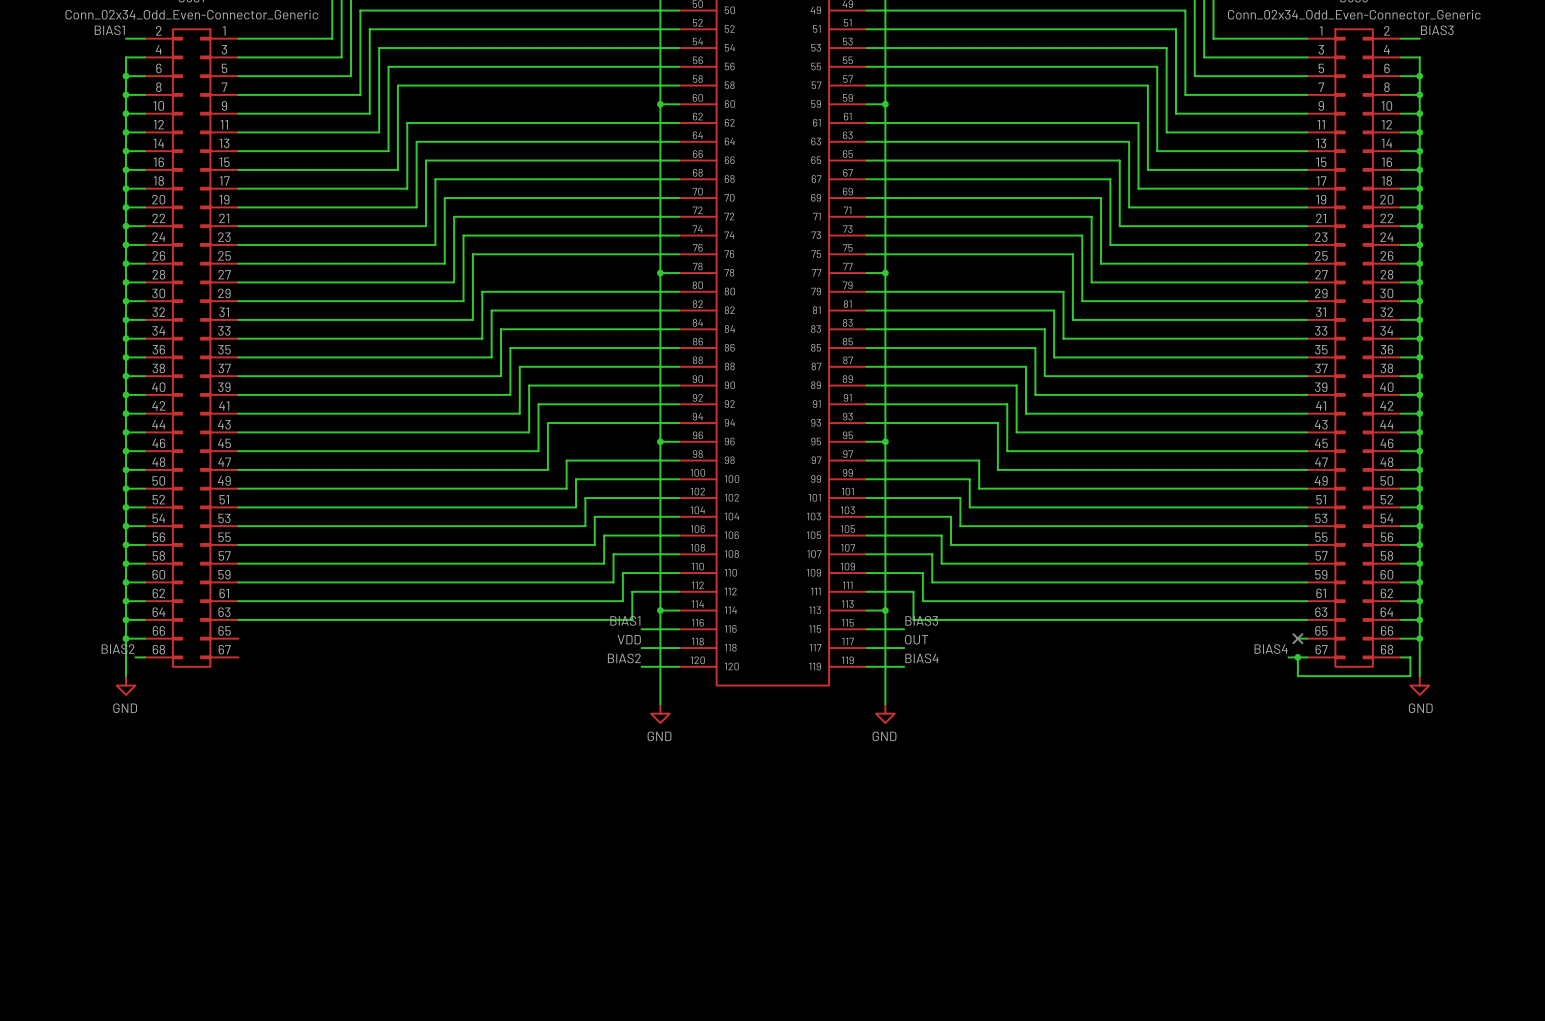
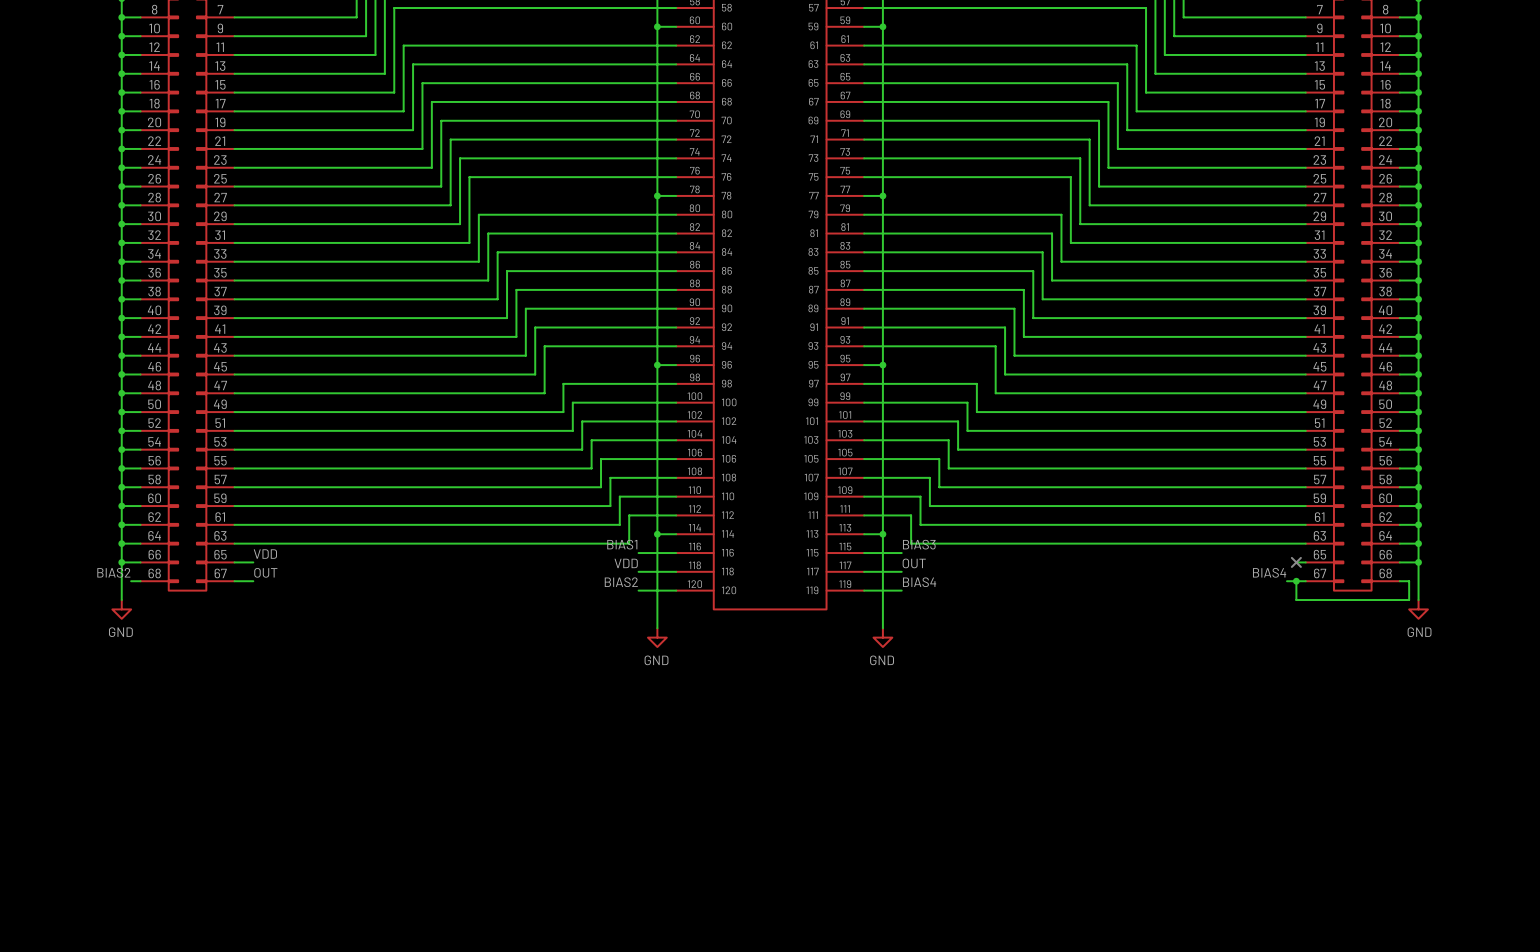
label: none -> VDD (265, 554)
wire: none -> (234, 562) (253, 562)
label: none -> OUT (265, 572)
wire: none -> (234, 581) (253, 581)

